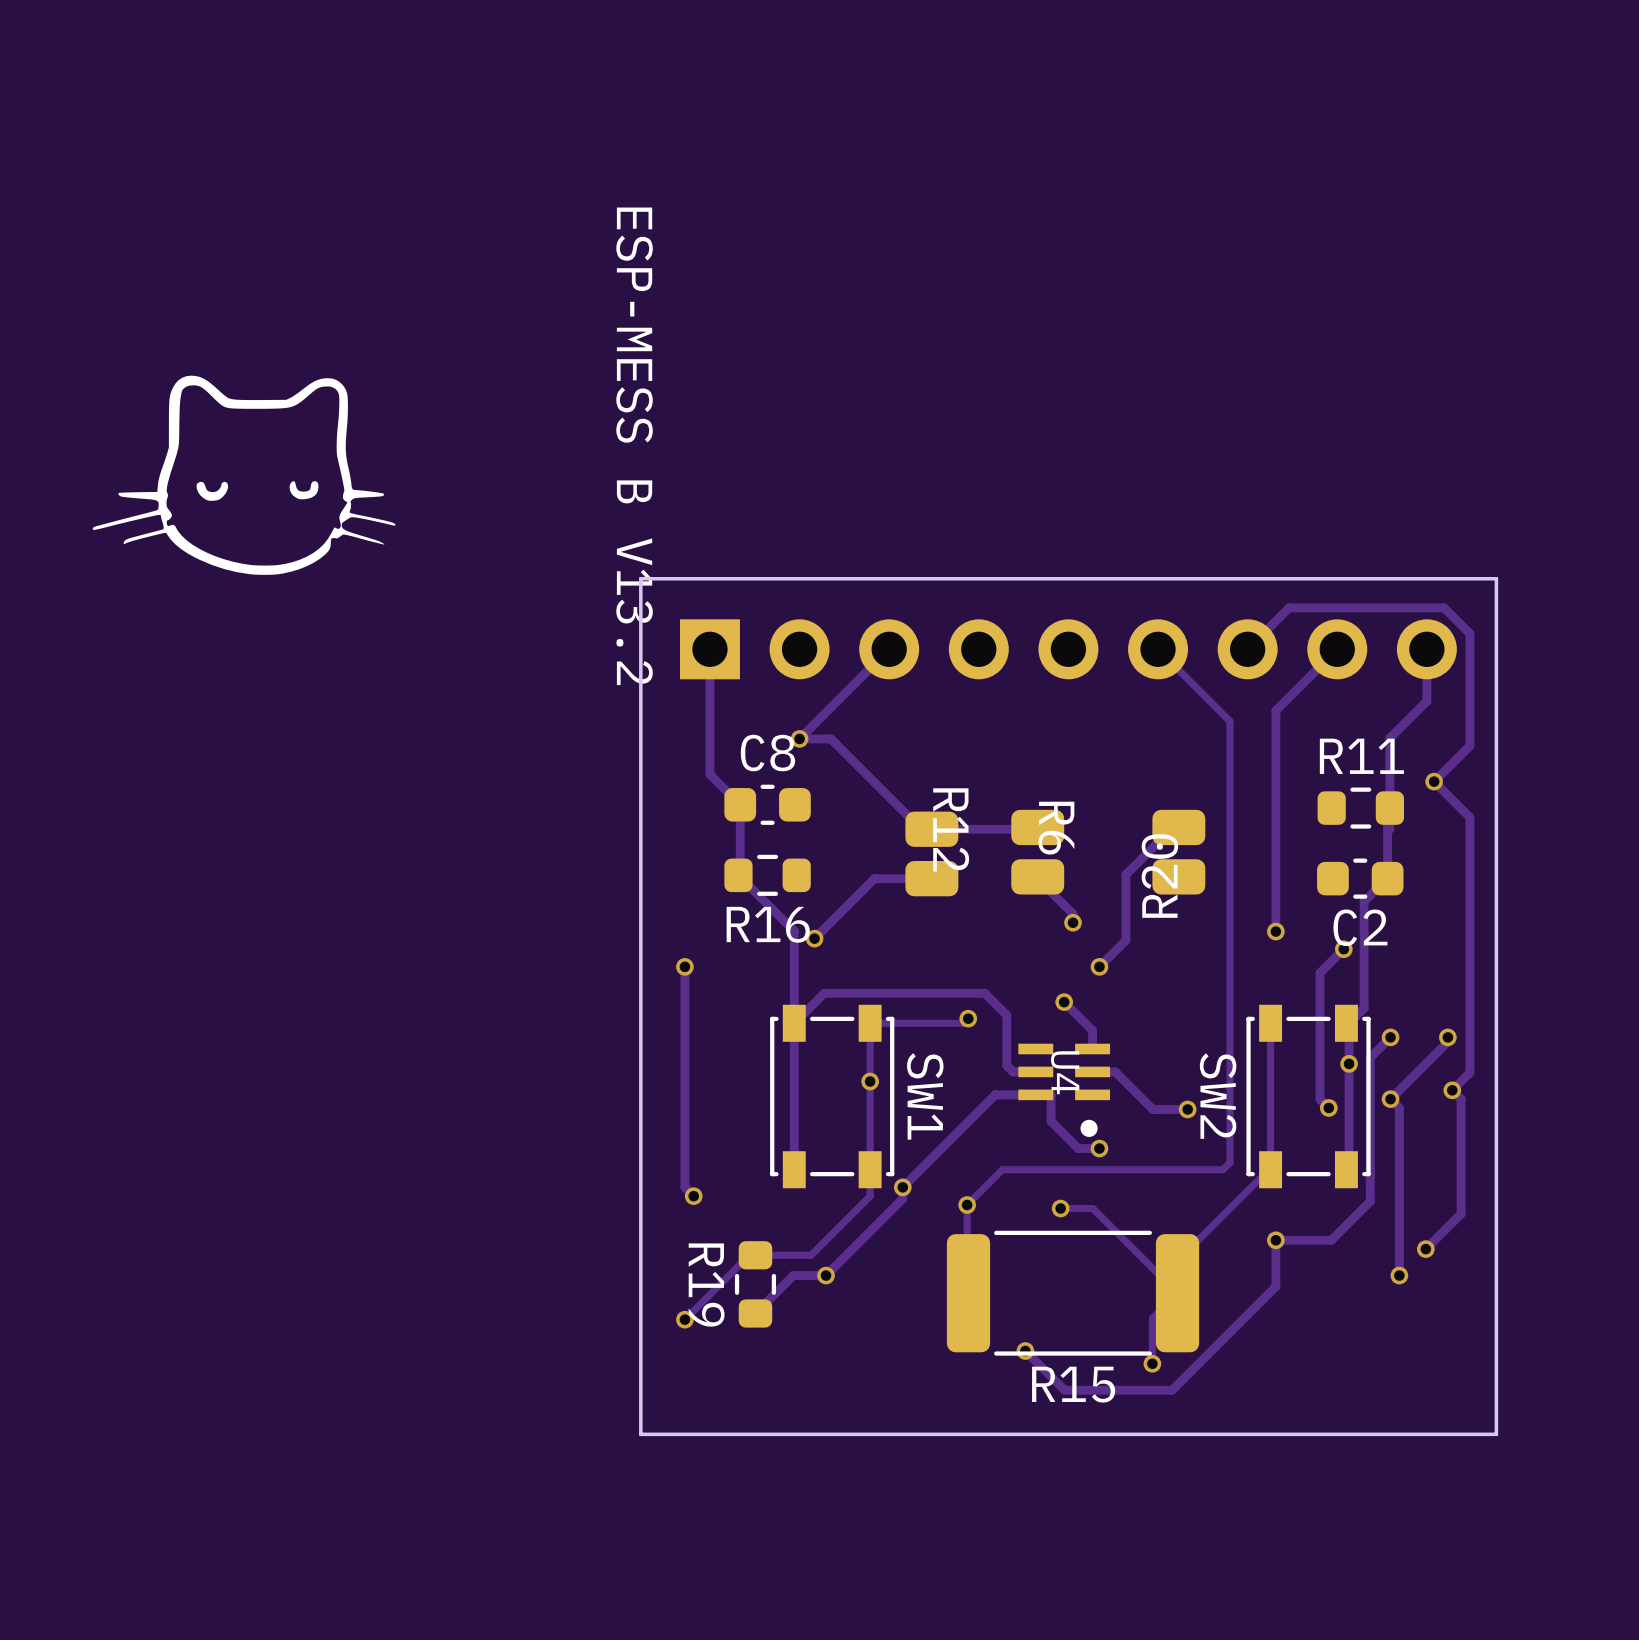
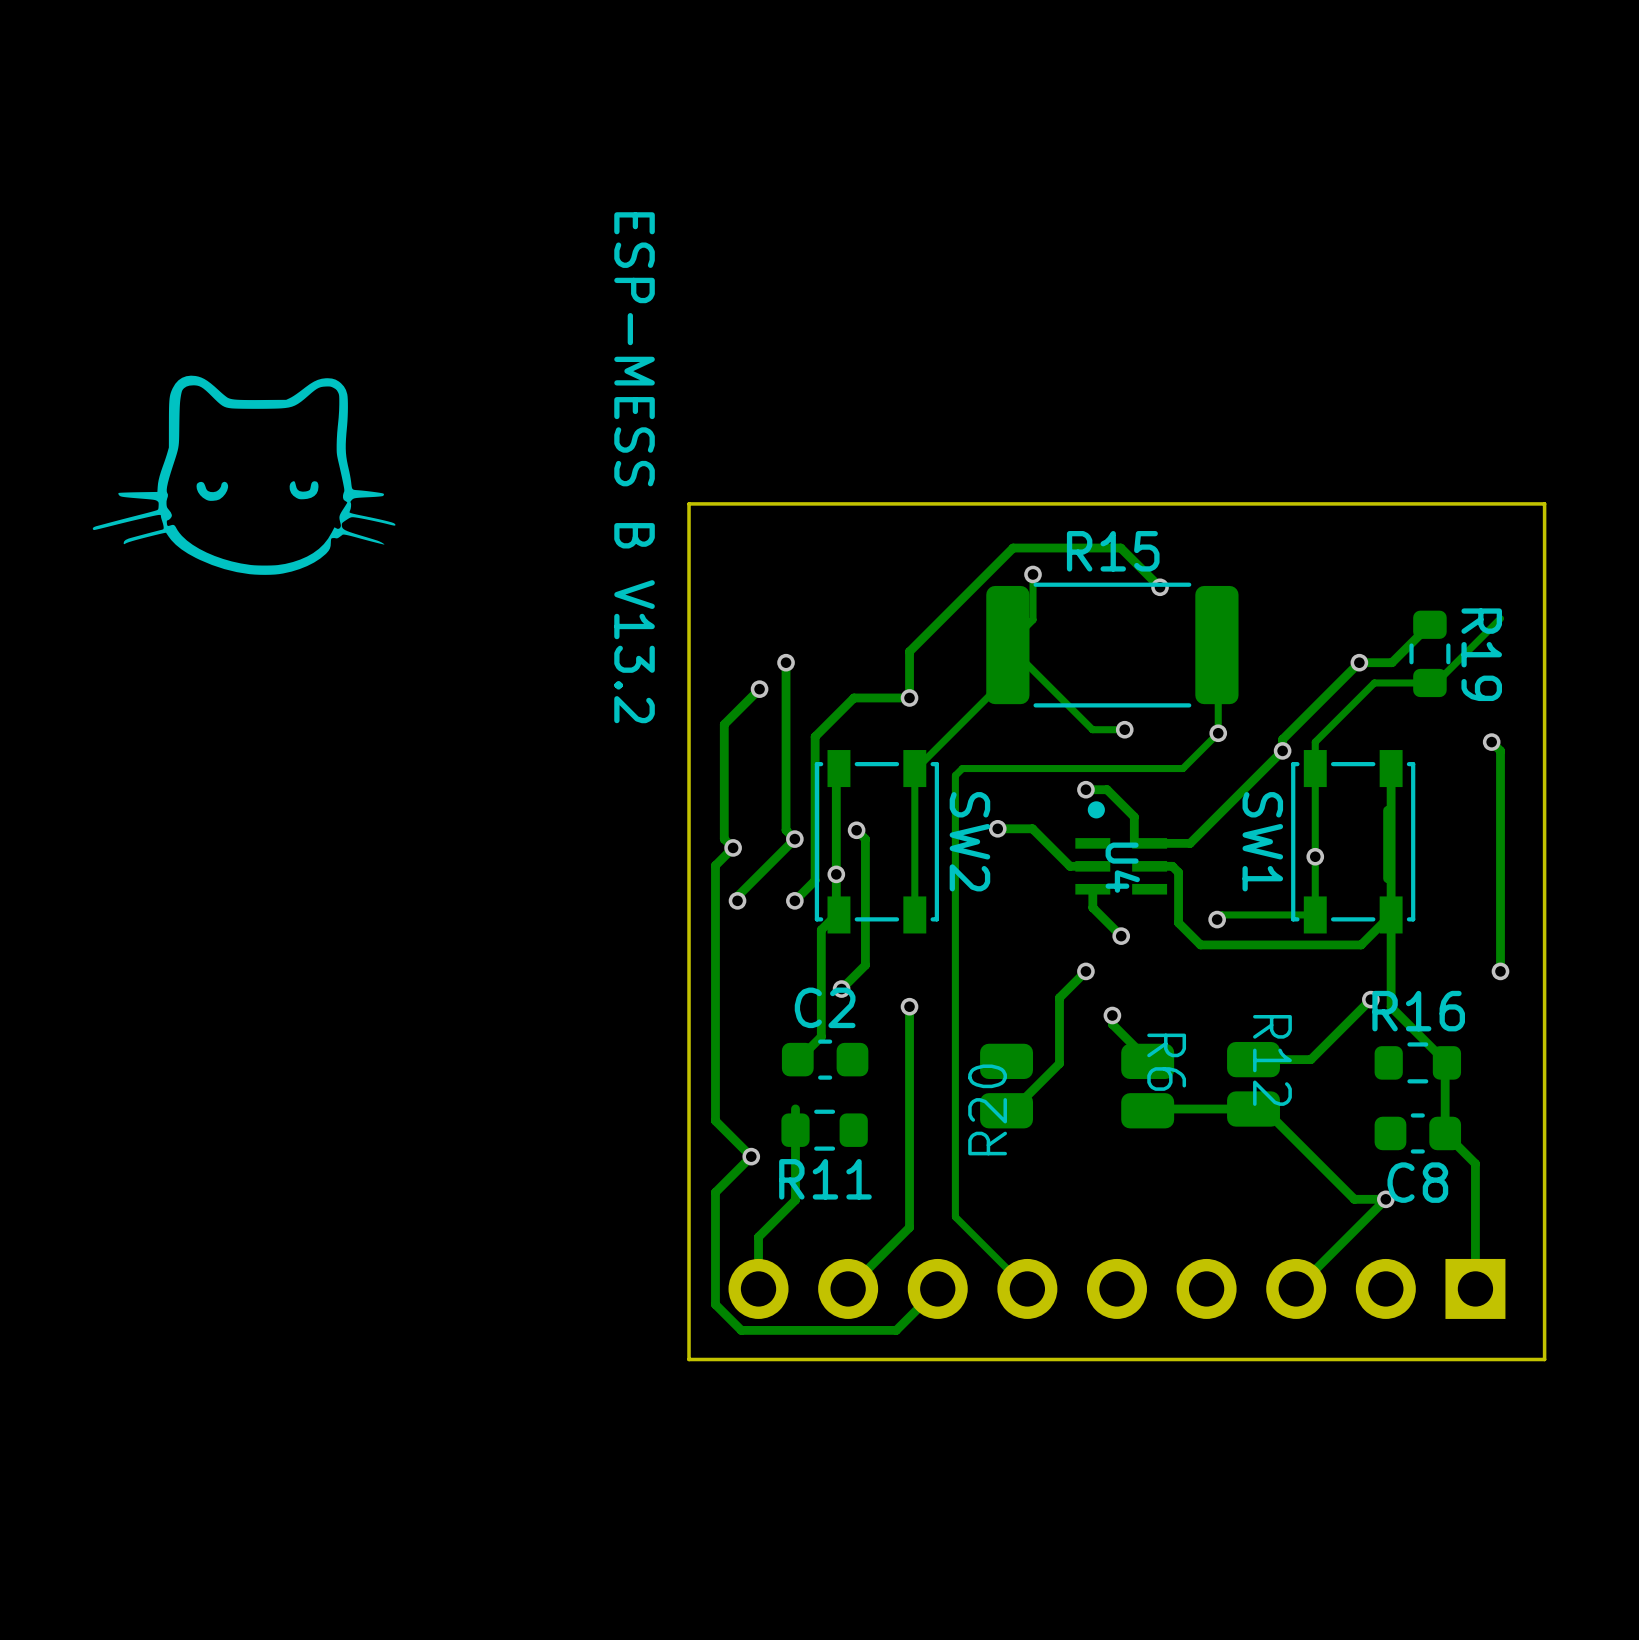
track: none -> (1033, 574) (1033, 619) (1007, 645)
via: none -> (1033, 574)
board edge: (1496, 578) (640, 578) (640, 1434) (1496, 1434) (1496, 578) -> (1544, 503) (689, 503) (689, 1359) (1544, 1359) (1544, 503)
track: none -> (1160, 587) (1120, 548) (1013, 548) (909, 651) (909, 697) (853, 697) (815, 736) (815, 880) (794, 900)
via: none -> (1160, 587)
track: none -> (1500, 618) (1436, 682) (1374, 682) (1315, 742) (1315, 914) (1221, 914) (1217, 919)
track: none -> (1429, 624) (1392, 662) (1359, 662) (1282, 739) (1282, 750) (1190, 843) (1134, 843) (1134, 816) (1107, 789) (1085, 789)
track: none -> (1007, 645) (1007, 677) (919, 765) (914, 765) (914, 912)
track: none -> (1007, 645) (1092, 729) (1124, 729)
track: none -> (1216, 645) (1218, 733) (1182, 768) (962, 768) (955, 775) (955, 1216) (1027, 1288)
track: (709, 649) (709, 774) (740, 804) (740, 873) -> none
track: (889, 649) (799, 738) (830, 738) (926, 834) -> none
part rotation: 0° (1068, 649) -> 180° (1116, 1288)
part position: (1068, 649) -> (1116, 1288)
track: (1158, 649) (1230, 721) (1230, 1162) (1222, 1169) (1002, 1169) (967, 1205) (968, 1293) -> none
track: (1247, 649) (1289, 607) (1444, 607) (1469, 633) (1469, 745) (1434, 781) (1469, 817) (1469, 1072) (1452, 1090) (1461, 1099) (1461, 1213) (1425, 1249) -> none
track: (1337, 649) (1275, 710) (1275, 931) -> none
track: (1426, 649) (1426, 701) (1389, 738) (1389, 829) -> none
track: none -> (786, 662) (786, 830) (794, 839) (737, 896) (737, 900)
via: none -> (786, 662)
via: none -> (1359, 662)
track: none -> (759, 689) (724, 724) (724, 839) (733, 847) (715, 865) (715, 1120) (751, 1156) (715, 1192) (715, 1304) (741, 1330) (896, 1330) (937, 1288)
via: none -> (759, 689)
via: none -> (909, 697)
via: none -> (1124, 729)
via: none -> (1218, 733)
via: (799, 738) -> none
track: none -> (1491, 742) (1500, 750) (1500, 971)
via: none -> (1282, 750)
C8 name position: C8 (767, 753) -> C8 (1417, 1182)
R11 name position: R11 (1361, 756) -> R11 (825, 1179)
track: none -> (838, 765) (836, 768) (836, 909) (838, 912) (821, 929) (821, 1036) (798, 1059)
track: none -> (1391, 768) (1391, 1007) (1446, 1062)
via position: (1434, 781) -> (1491, 742)
via: none -> (1085, 789)
C8 position: (767, 804) -> (1417, 1133)
R11 position: (1360, 808) -> (824, 1130)
track: (1178, 827) (1173, 827) (1125, 874) (1125, 940) (1099, 966) -> none
track: none -> (997, 828) (1032, 828) (1070, 866) (1092, 866)
via: none -> (997, 828)
track: (1037, 829) (931, 829) -> (1253, 1109) (1147, 1109)
track: none -> (856, 830) (865, 839) (865, 965) (841, 989)
via: none -> (856, 830)
via: none -> (794, 839)
via: none -> (733, 847)
R6 position: (1037, 852) -> (1147, 1086)
R20 position: (1178, 852) -> (1006, 1086)
R12 position: (931, 853) -> (1253, 1084)
via: none -> (1315, 856)
track: none -> (1149, 866) (1172, 866) (1178, 872) (1178, 922) (1200, 944) (1361, 944) (1391, 914)
via: none -> (836, 874)
track: (738, 875) (794, 931) (794, 1169) -> none
R16 position: (767, 875) -> (1417, 1062)
track: (931, 878) (874, 878) (814, 938) -> none
track: (1037, 878) (1073, 913) (1073, 922) -> none
C2 position: (1360, 878) -> (825, 1059)
track: (1386, 878) (1364, 901) (1364, 1008) (1346, 1025) (1349, 1028) (1349, 1169) (1346, 1172) -> none
track: none -> (1092, 889) (1092, 907) (1121, 936)
via: none -> (737, 900)
via: none -> (794, 900)
via: none -> (1217, 919)
via: (1073, 922) -> none
R16 name position: R16 (768, 924) -> R16 (1418, 1011)
C2 name position: C2 (1360, 927) -> C2 (825, 1007)
via: (1275, 931) -> none
via: none -> (1121, 936)
via: (814, 938) -> none
track: (1343, 949) (1319, 973) (1319, 1099) (1328, 1107) -> none
via: (1343, 949) -> none
track: (684, 966) (684, 1187) (693, 1196) -> none
via: (684, 966) -> none
via position: (1099, 966) -> (1085, 971)
track: none -> (1085, 971) (1059, 997) (1059, 1063) (1012, 1110) (1006, 1110)
via: none -> (1500, 971)
via: none -> (841, 989)
track: none -> (1370, 999) (1310, 1059) (1253, 1059)
via: none -> (1370, 999)
track: (1064, 1002) (1092, 1030) (1092, 1049) -> none
via: (1064, 1002) -> none
track: none -> (909, 1006) (909, 1227) (848, 1288)
via: none -> (909, 1006)
track: none -> (1112, 1015) (1112, 1024) (1147, 1059)
via: none -> (1112, 1015)
track: (968, 1018) (963, 1023) (870, 1023) (870, 1196) (811, 1255) (749, 1255) (684, 1319) -> none
via: (968, 1018) -> none
track: (794, 1023) (824, 993) (984, 993) (1006, 1015) (1006, 1065) (1013, 1071) (1035, 1071) -> none
track: (1270, 1025) (1270, 1172) (1266, 1172) (1177, 1261) (1177, 1293) -> none
track: (1390, 1037) (1370, 1057) (1370, 1201) (1331, 1240) (1275, 1240) (1275, 1286) (1172, 1390) (1064, 1390) (1025, 1350) -> none
via: (1390, 1037) -> none
track: (1447, 1037) (1447, 1041) (1390, 1099) (1399, 1107) (1399, 1275) -> none
via: (1447, 1037) -> none
via: (1349, 1063) -> none
track: none -> (1445, 1064) (1445, 1133) (1475, 1163) (1475, 1288)
track: (1092, 1071) (1115, 1071) (1152, 1109) (1187, 1109) -> none
via: (870, 1081) -> none
U4 rotation: 0° (1064, 1090) -> 180° (1121, 847)
U4 position: (1064, 1090) -> (1121, 847)
via: (1452, 1090) -> none
SW1 position: (832, 1096) -> (1353, 841)
SW1 name position: SW1 (925, 1096) -> SW1 (1262, 841)
SW2 name position: SW2 (1218, 1096) -> SW2 (969, 841)
SW2 position: (1308, 1096) -> (876, 841)
via: (1390, 1099) -> none
track: none -> (1258, 1103) (1354, 1199) (1385, 1199) (1296, 1288)
via: (1328, 1107) -> none
track: none -> (795, 1108) (795, 1200) (758, 1237) (758, 1288)
via: (1187, 1109) -> none
track: (1099, 1148) (1078, 1148) (1051, 1121) (1051, 1094) (995, 1094) (902, 1187) (902, 1198) (826, 1275) (793, 1275) (755, 1313) -> none
via: (1099, 1148) -> none
via: (902, 1187) -> none
via position: (693, 1196) -> (751, 1156)
via: none -> (1385, 1199)
via: (967, 1205) -> none
track: (1060, 1208) (1092, 1208) (1177, 1293) -> none
via: (1060, 1208) -> none
via: (1275, 1240) -> none
via: (1425, 1249) -> none
via: (826, 1275) -> none
via: (1399, 1275) -> none
R19 position: (755, 1284) -> (1429, 653)
R19 name position: R19 (706, 1285) -> R19 (1481, 654)
R15 position: (1073, 1293) -> (1112, 645)
track: (1177, 1293) (1152, 1318) (1152, 1363) -> none
via: (684, 1319) -> none
via: (1025, 1350) -> none
via: (1152, 1363) -> none
R15 name position: R15 (1073, 1384) -> R15 (1113, 551)

